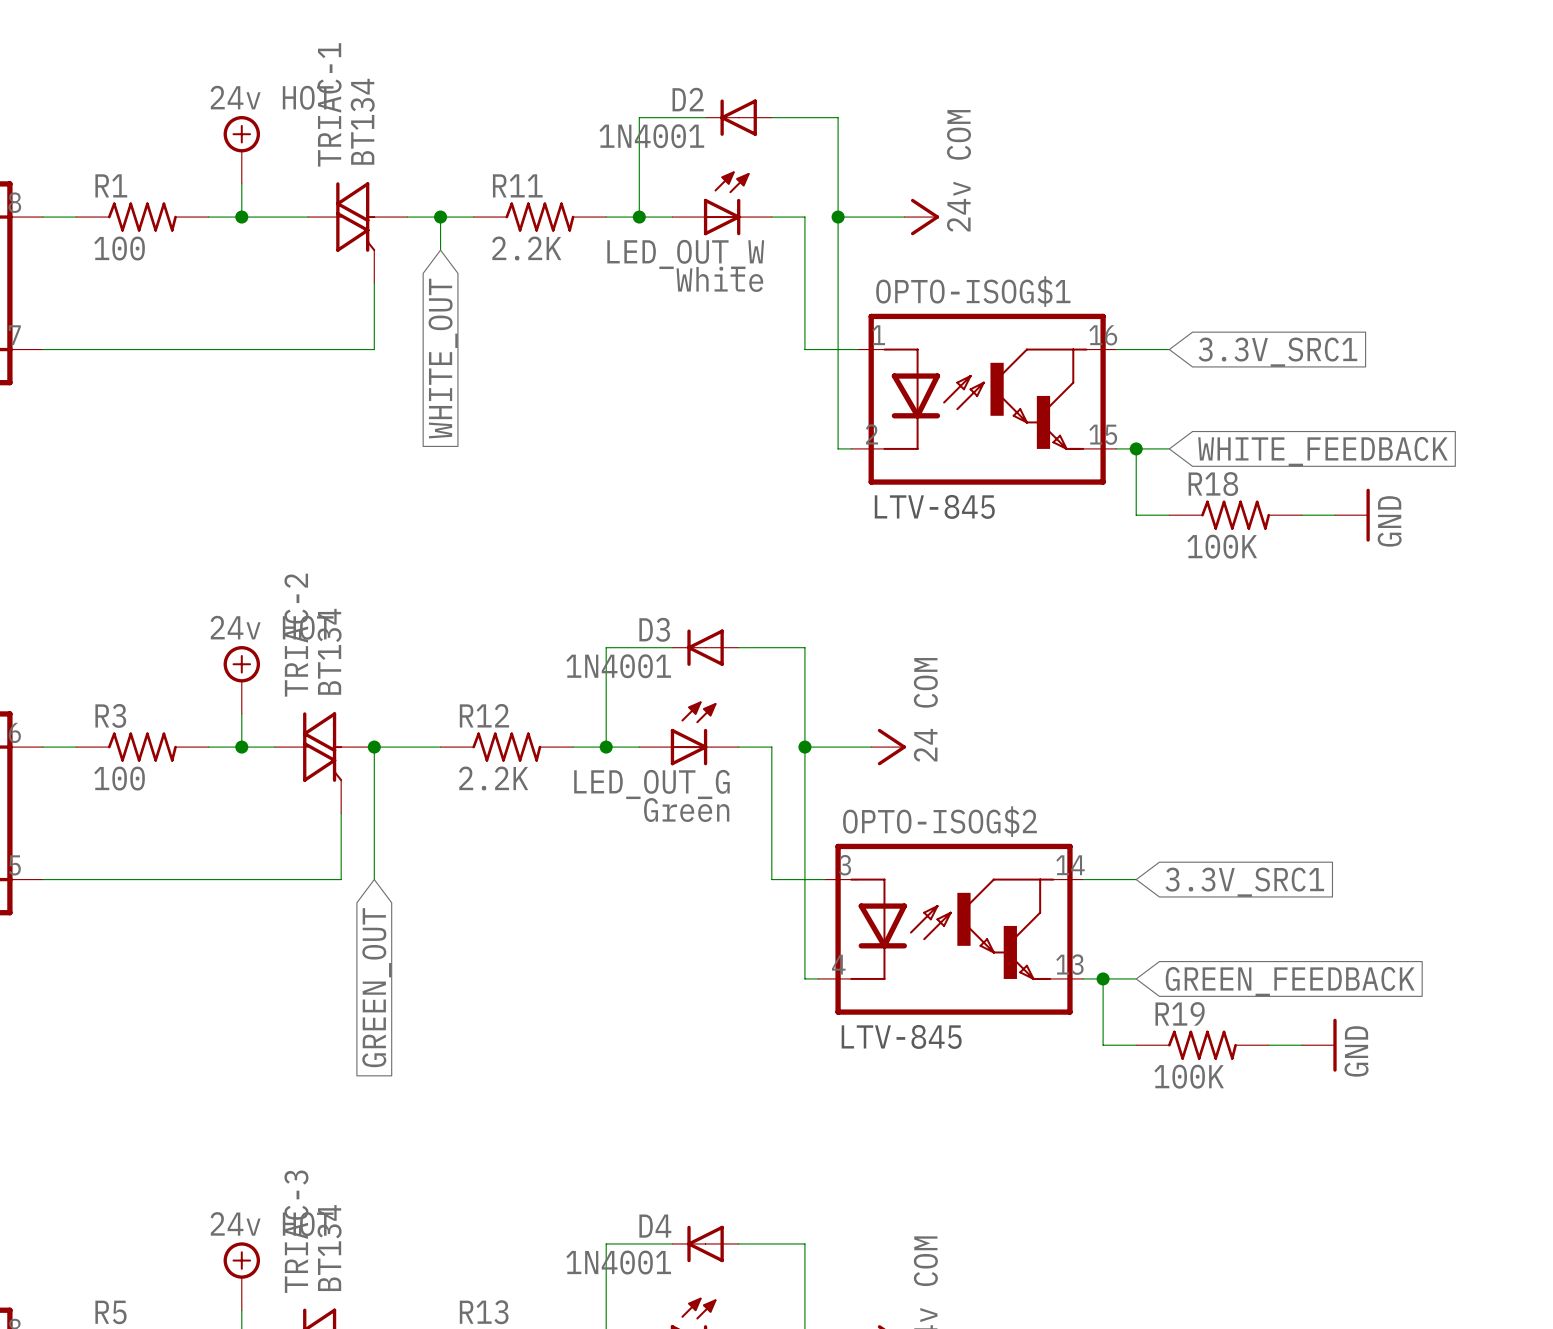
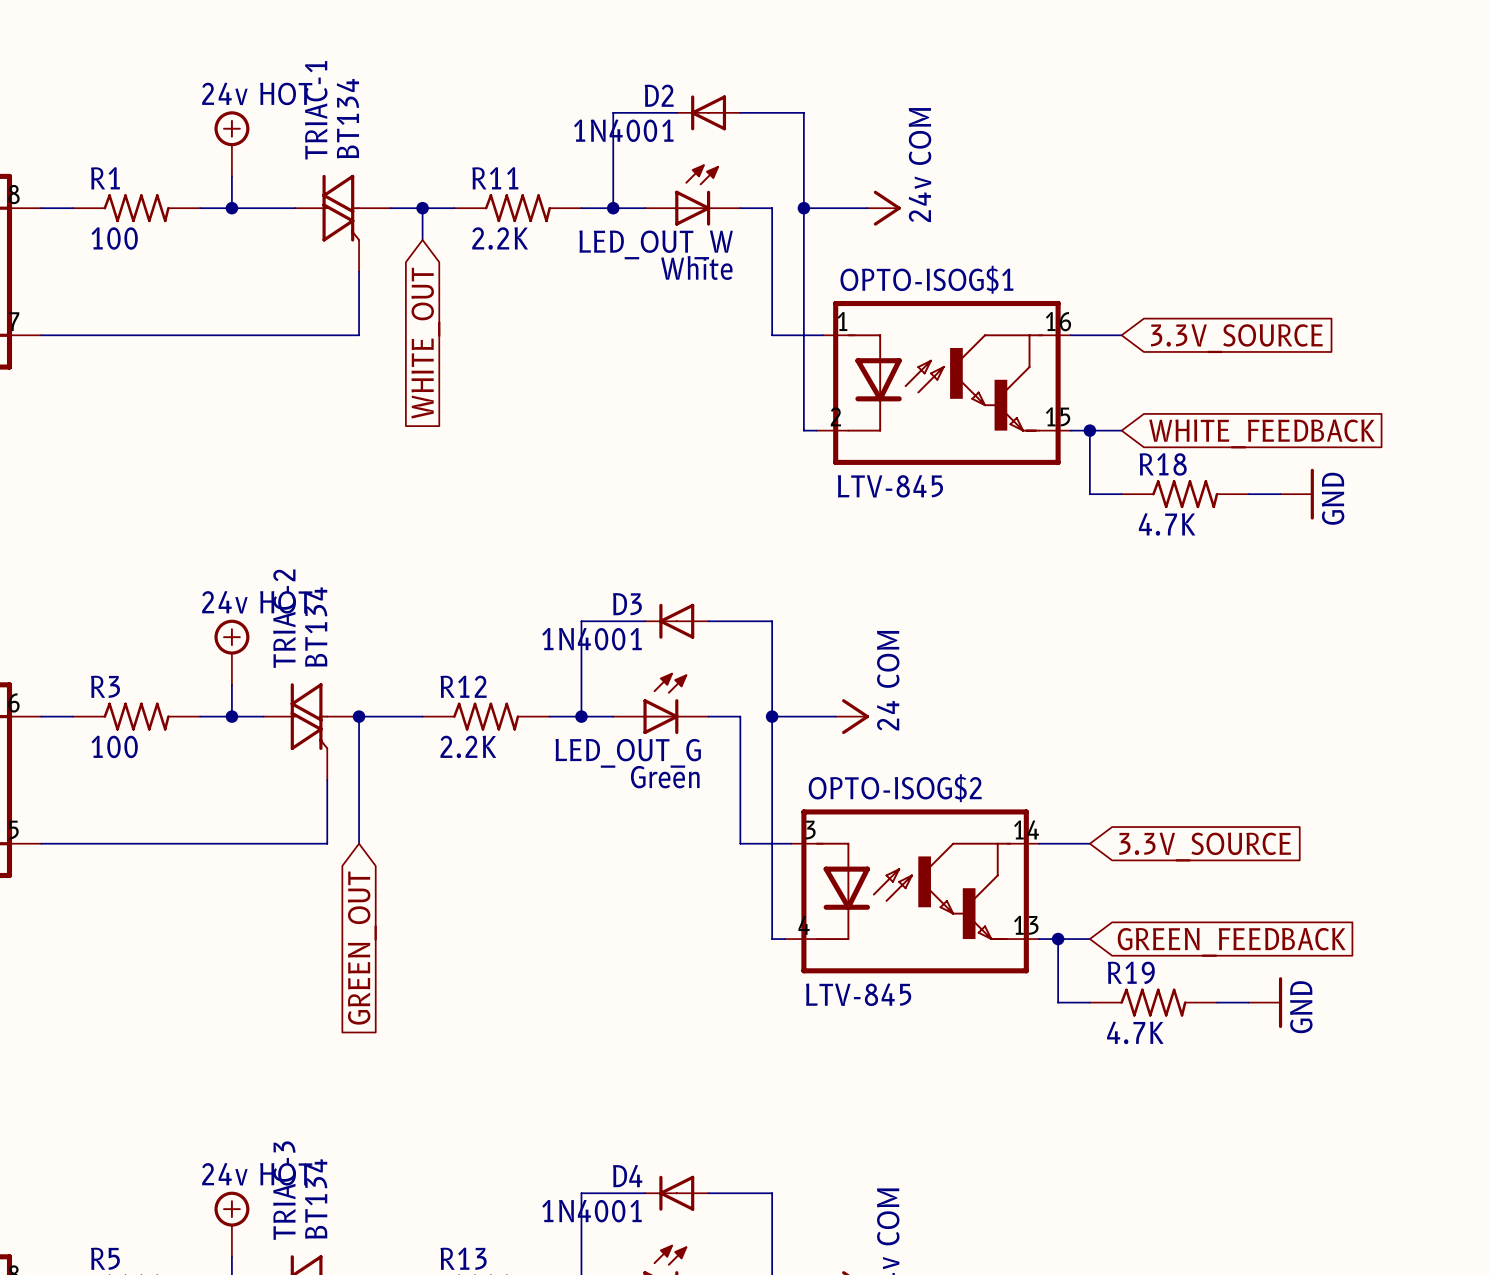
global label: 3.3V_SRC1 (1277, 352) -> 3.3V_SOURCE (1236, 338)
R18 value: 100K (1222, 546) -> 4.7K (1167, 524)
global label: 3.3V_SRC1 (1244, 882) -> 3.3V_SOURCE (1205, 847)
R19 value: 100K (1189, 1076) -> 4.7K (1135, 1032)

